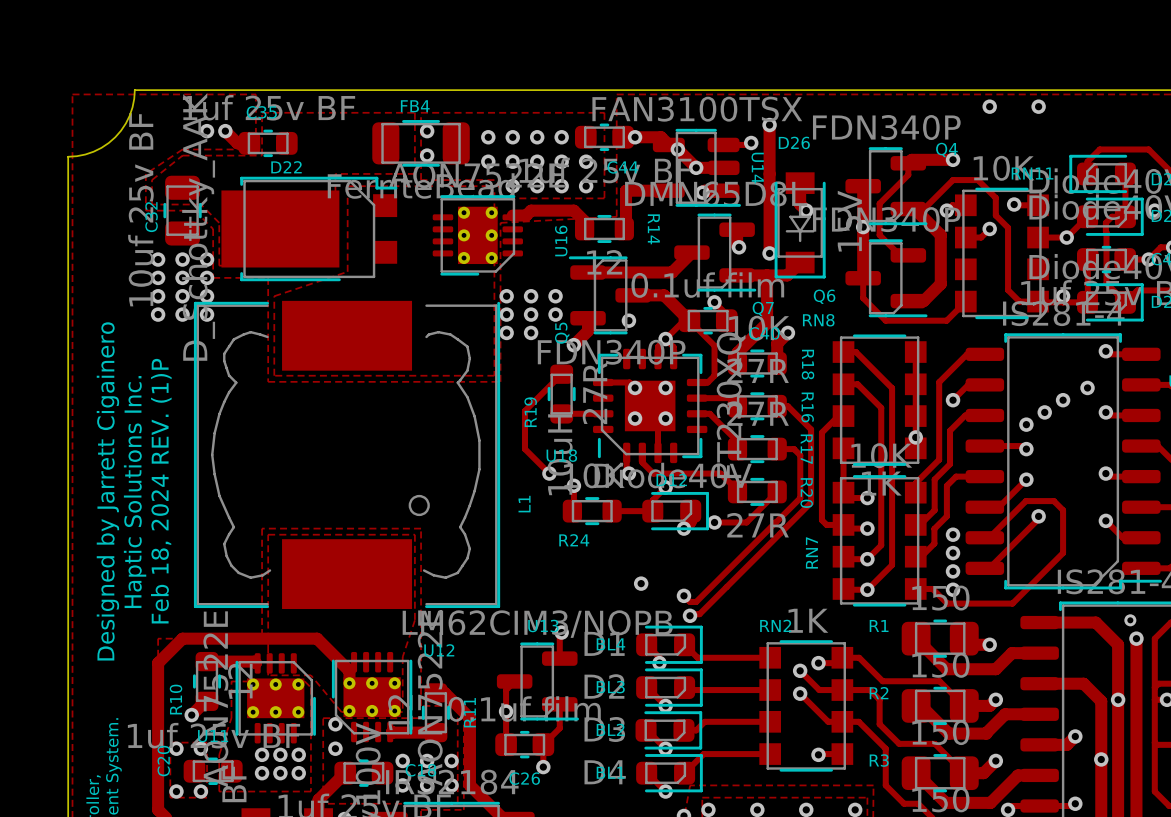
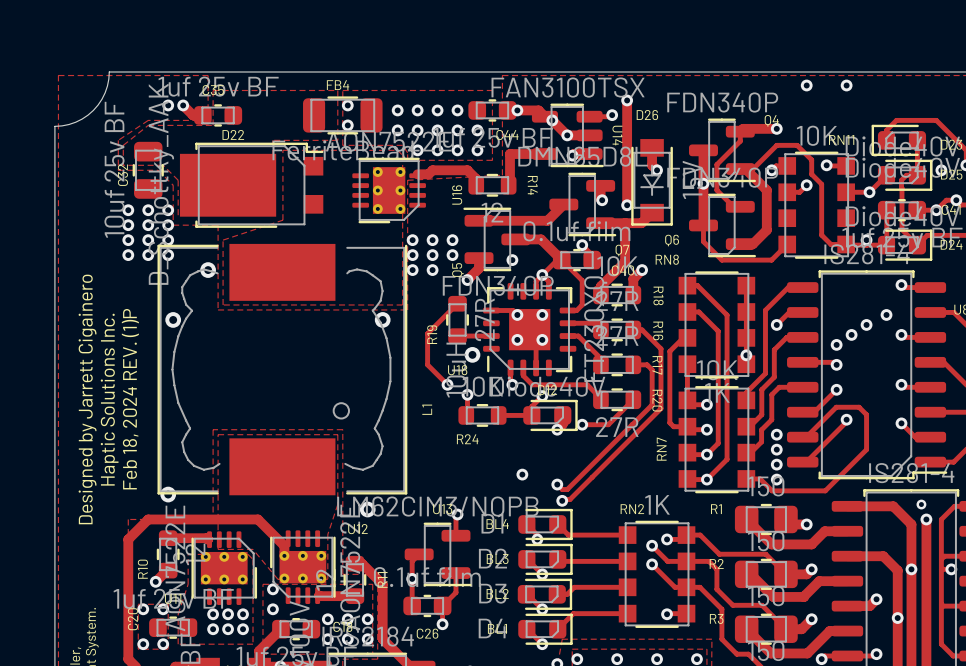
via: none -> (208, 270)
via: none -> (173, 319)
via: none -> (382, 319)
via: none -> (472, 354)
via: none -> (168, 494)
via: none -> (367, 509)

